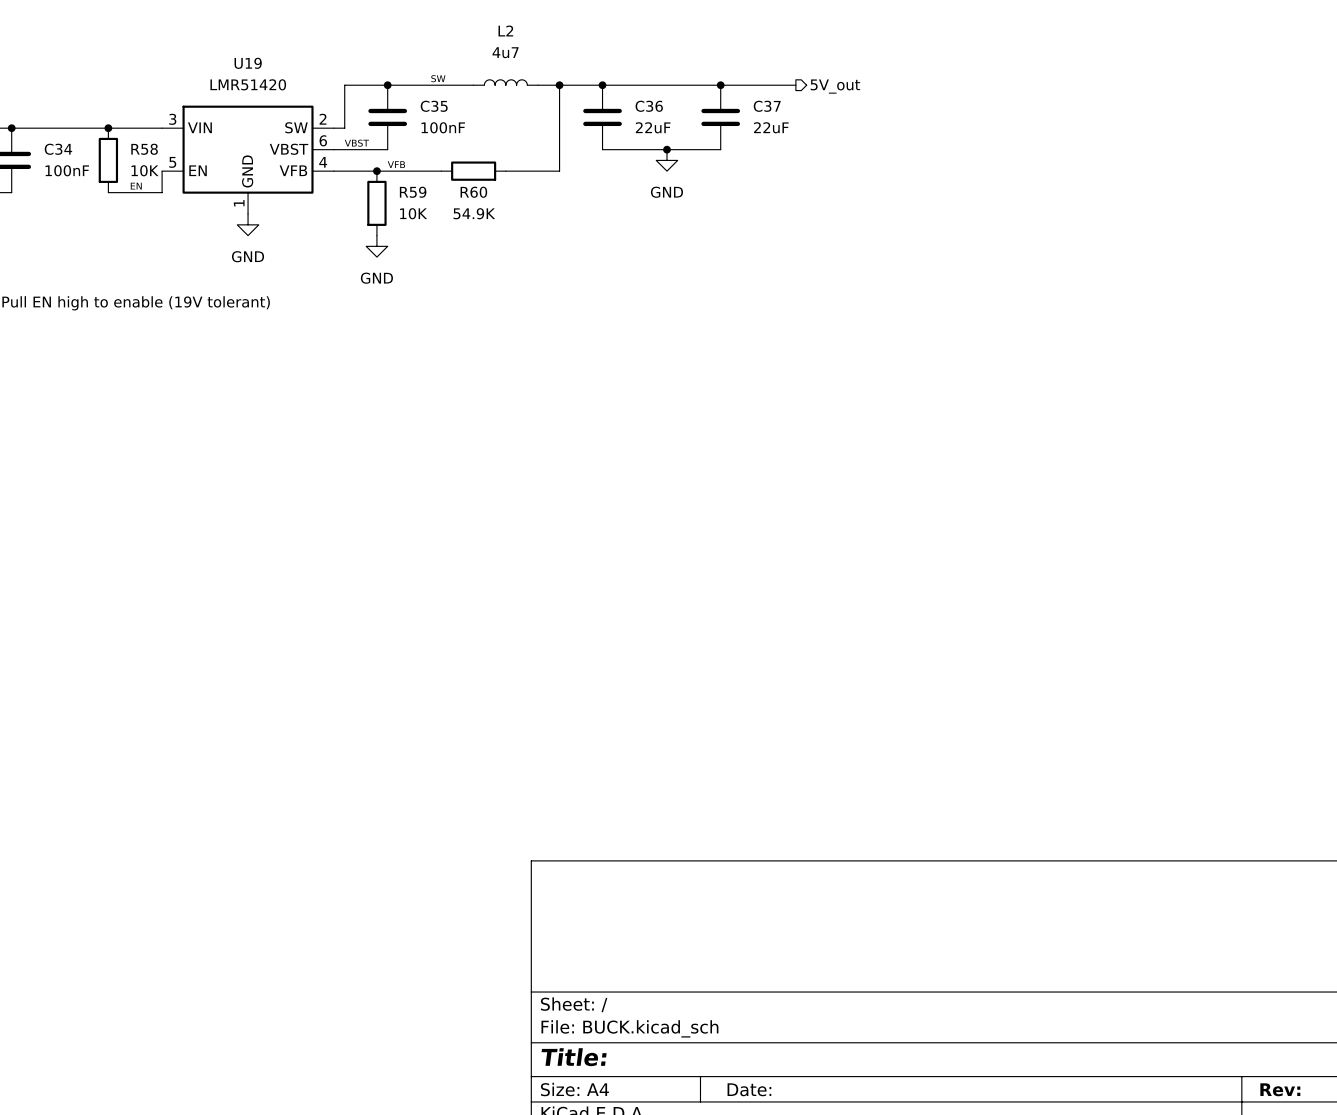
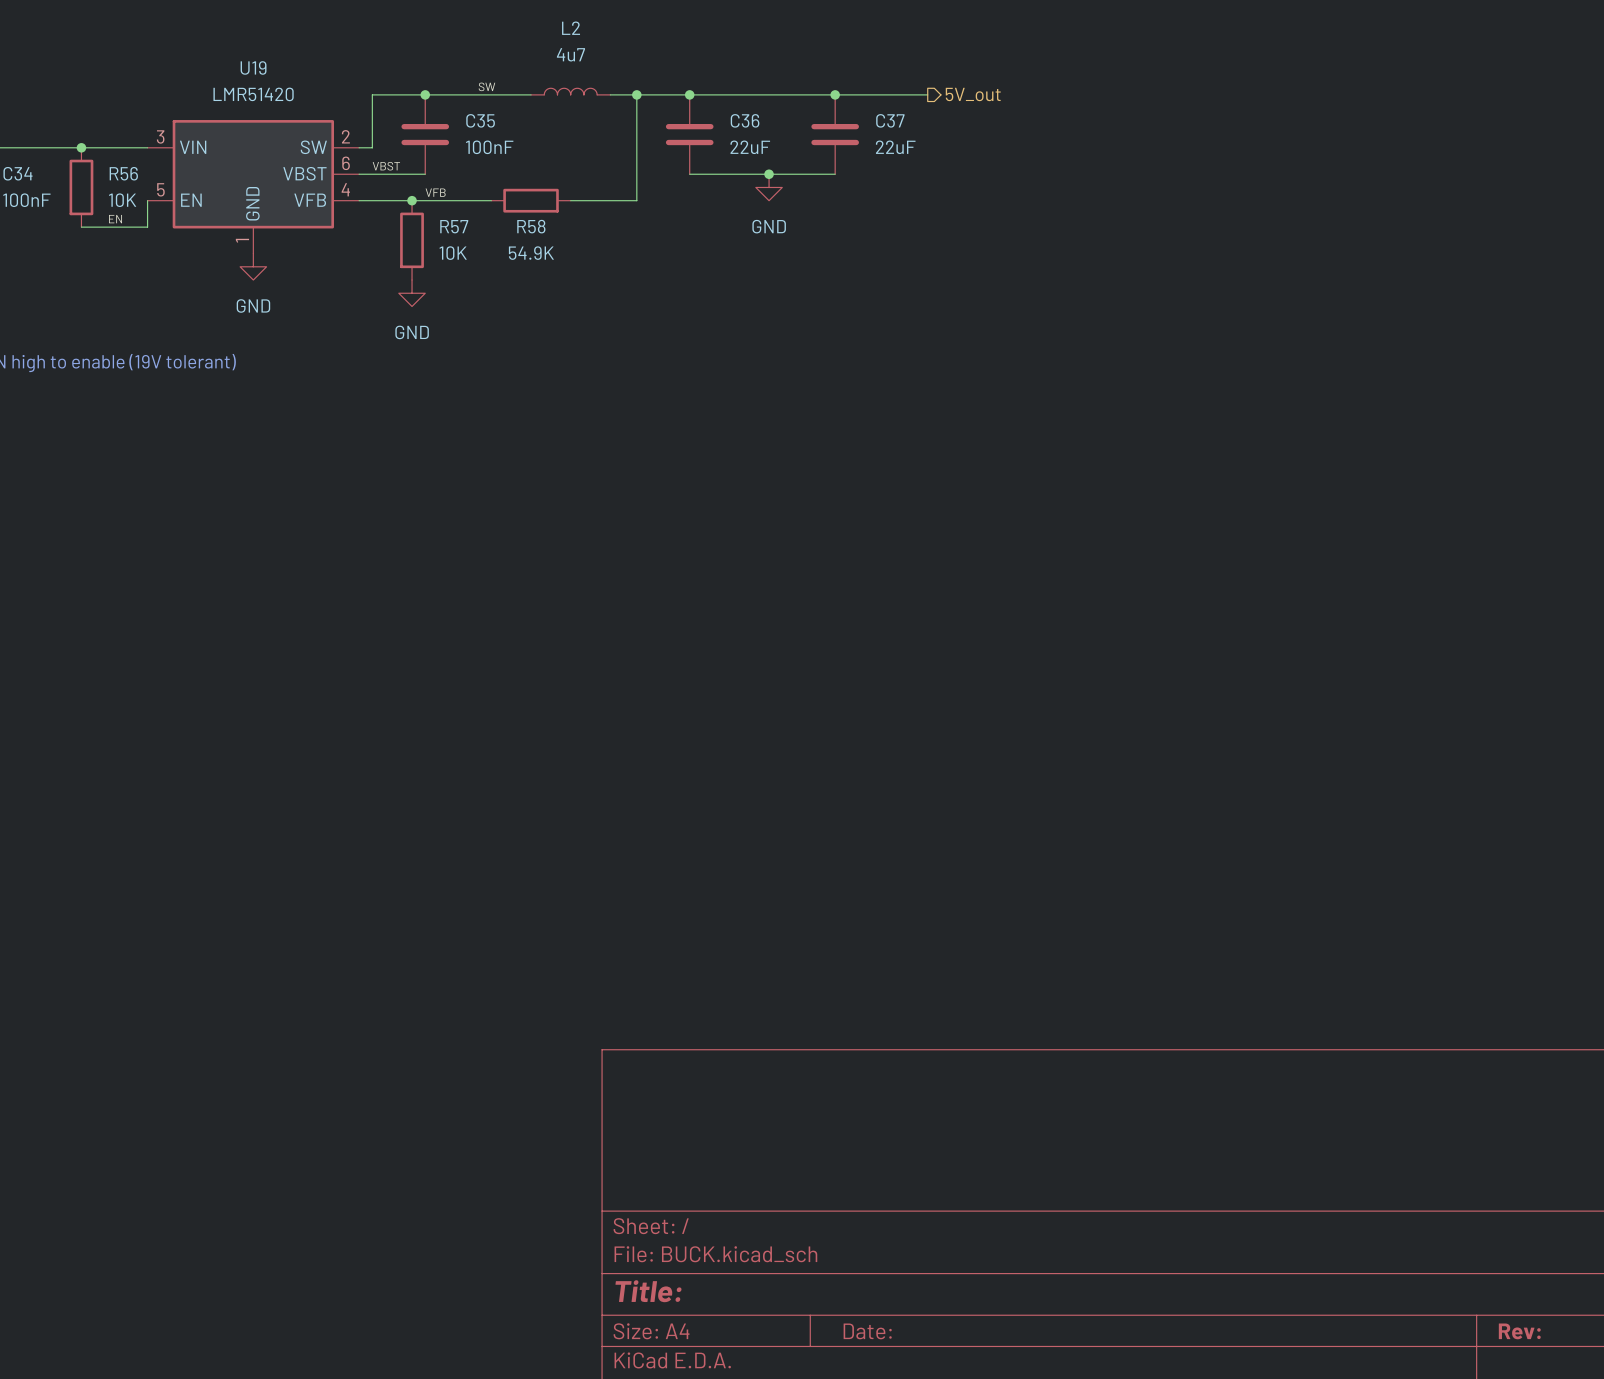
R58 name: R58 (144, 149) -> R56 (123, 173)
R59 name: R59 (413, 192) -> R57 (454, 226)
R60 name: R60 (473, 192) -> R58 (531, 226)

